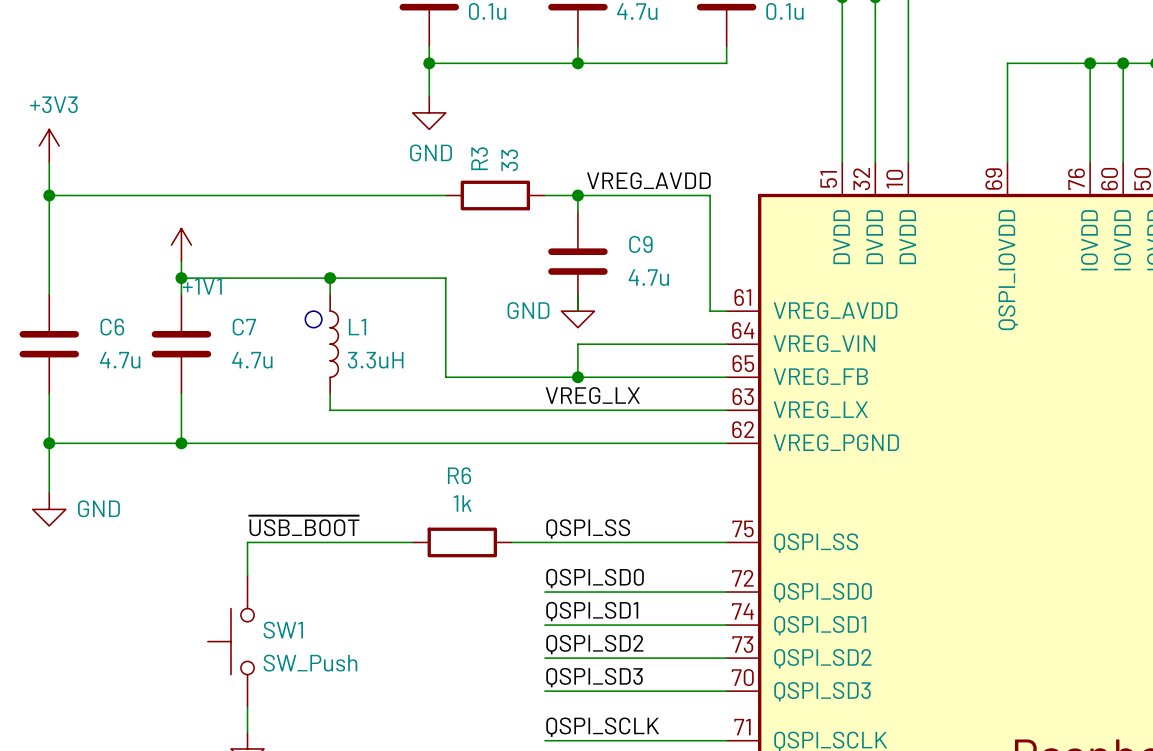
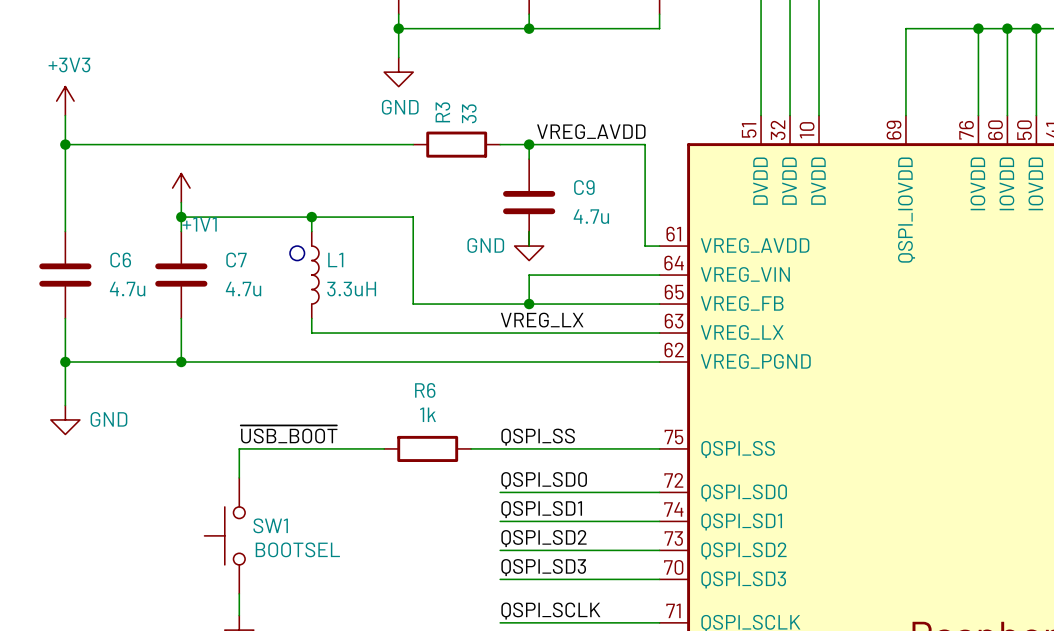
SW1 value: SW_Push (310, 663) -> BOOTSEL (297, 549)

